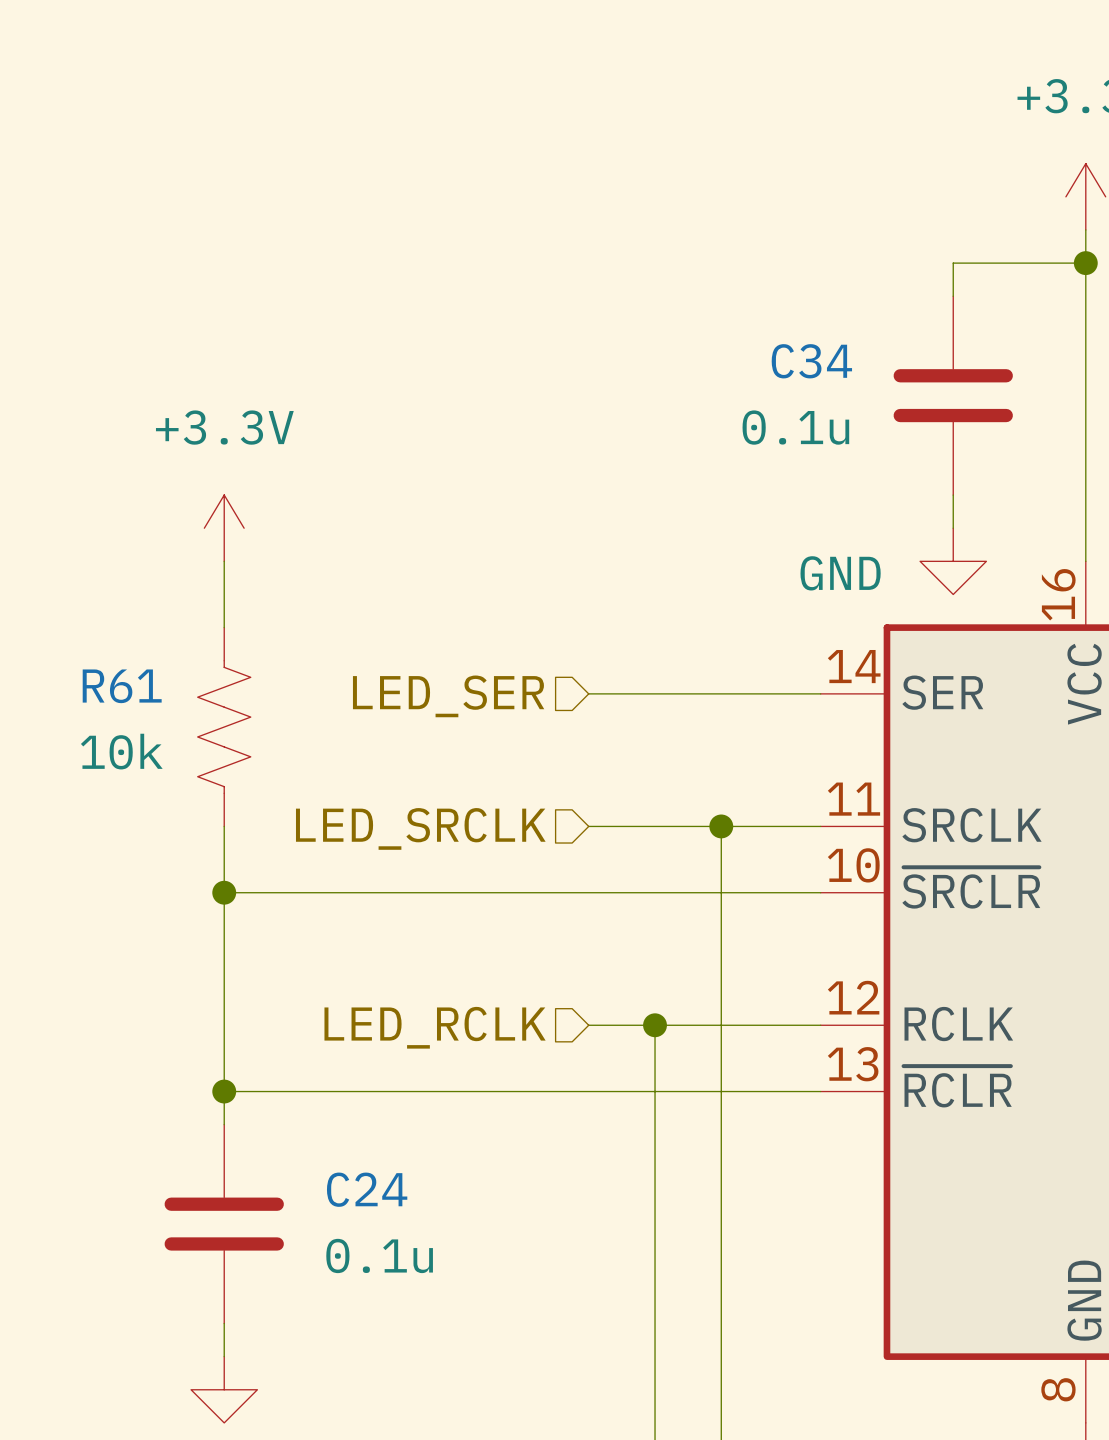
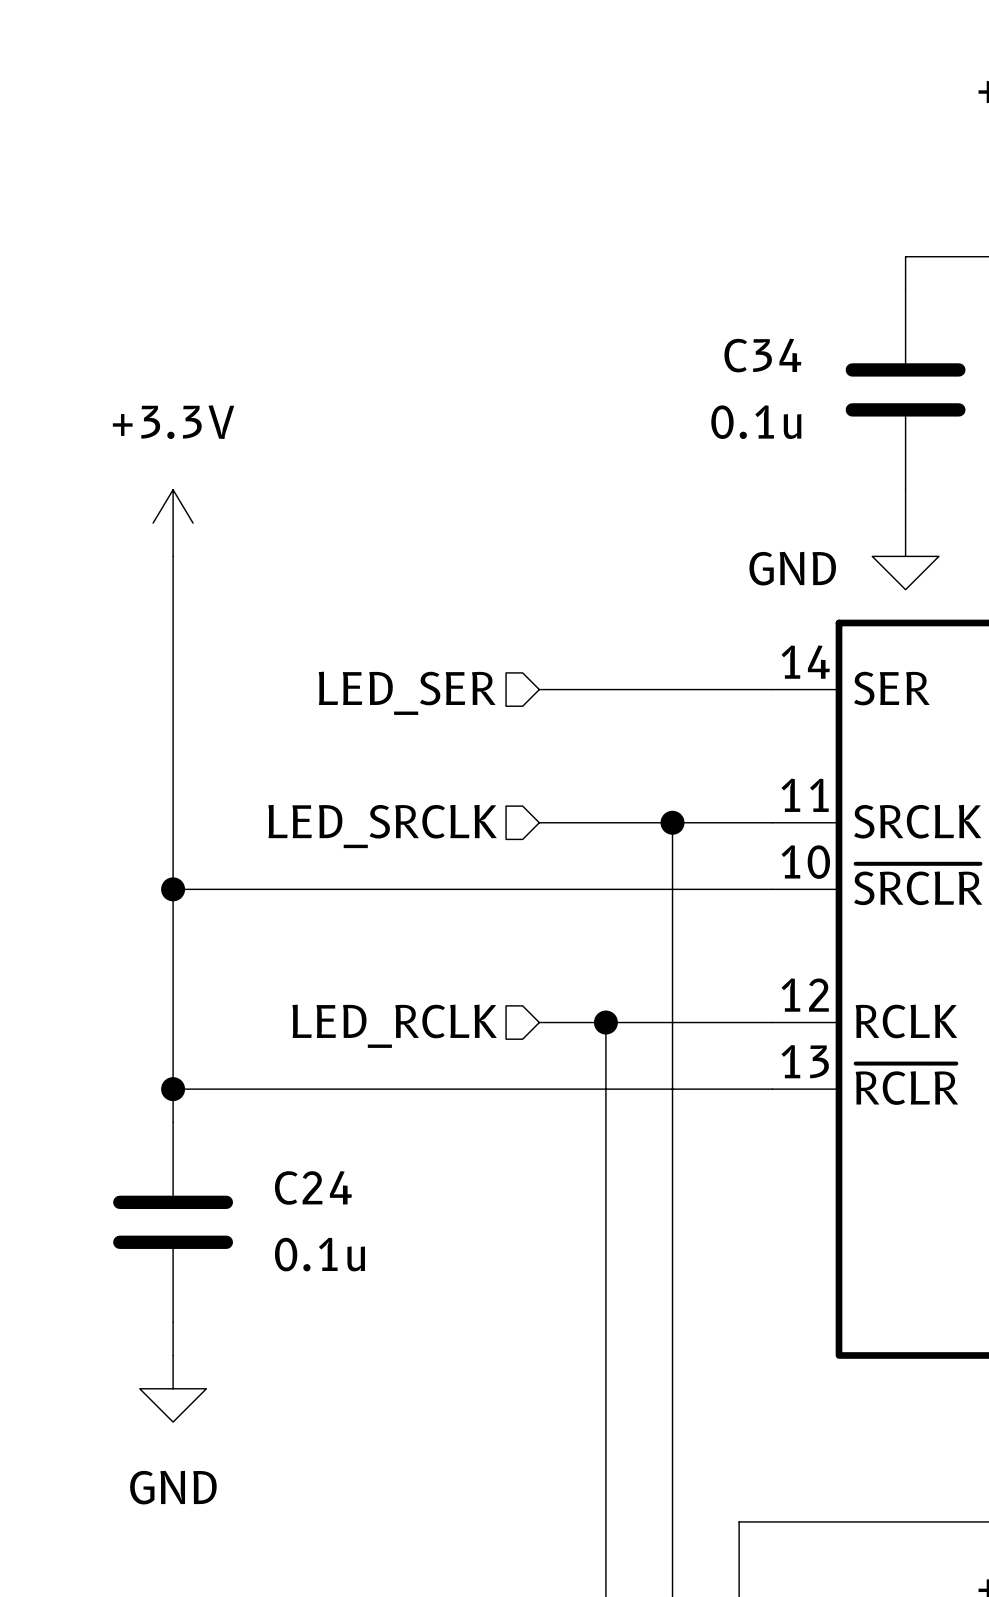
wire: none -> (173, 622) (173, 822)
R61: 10k (224, 727) -> none

